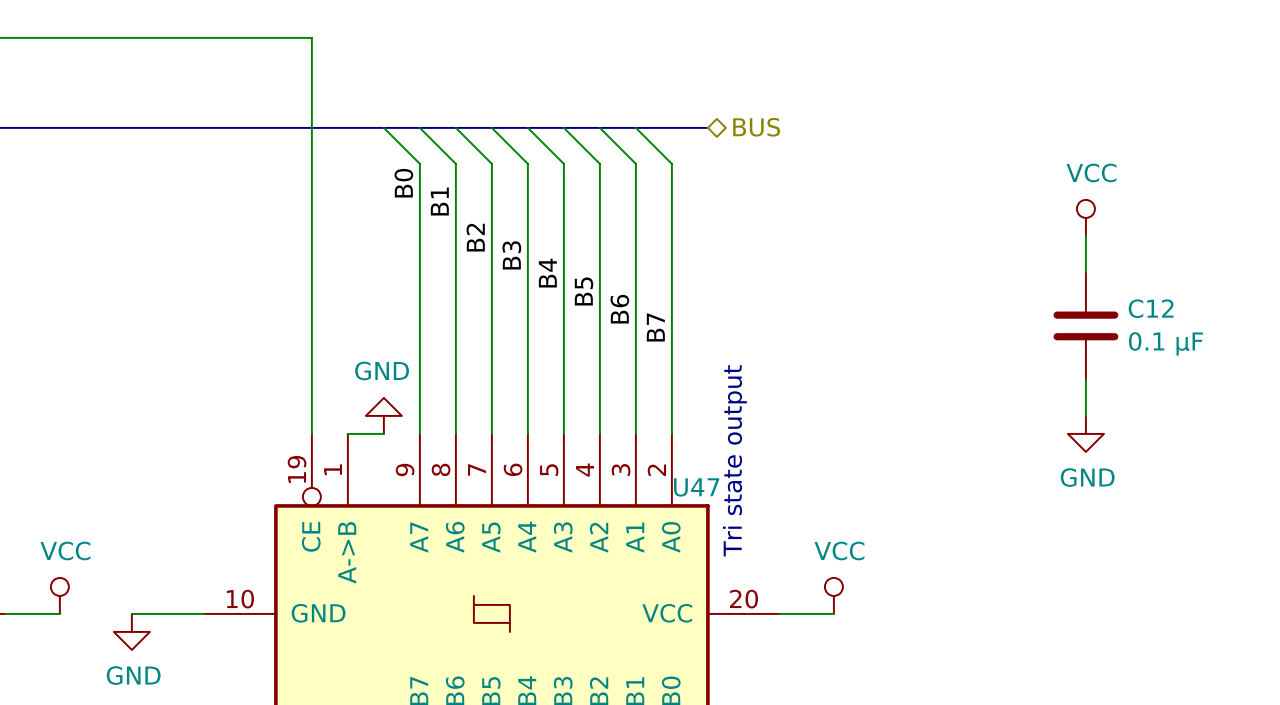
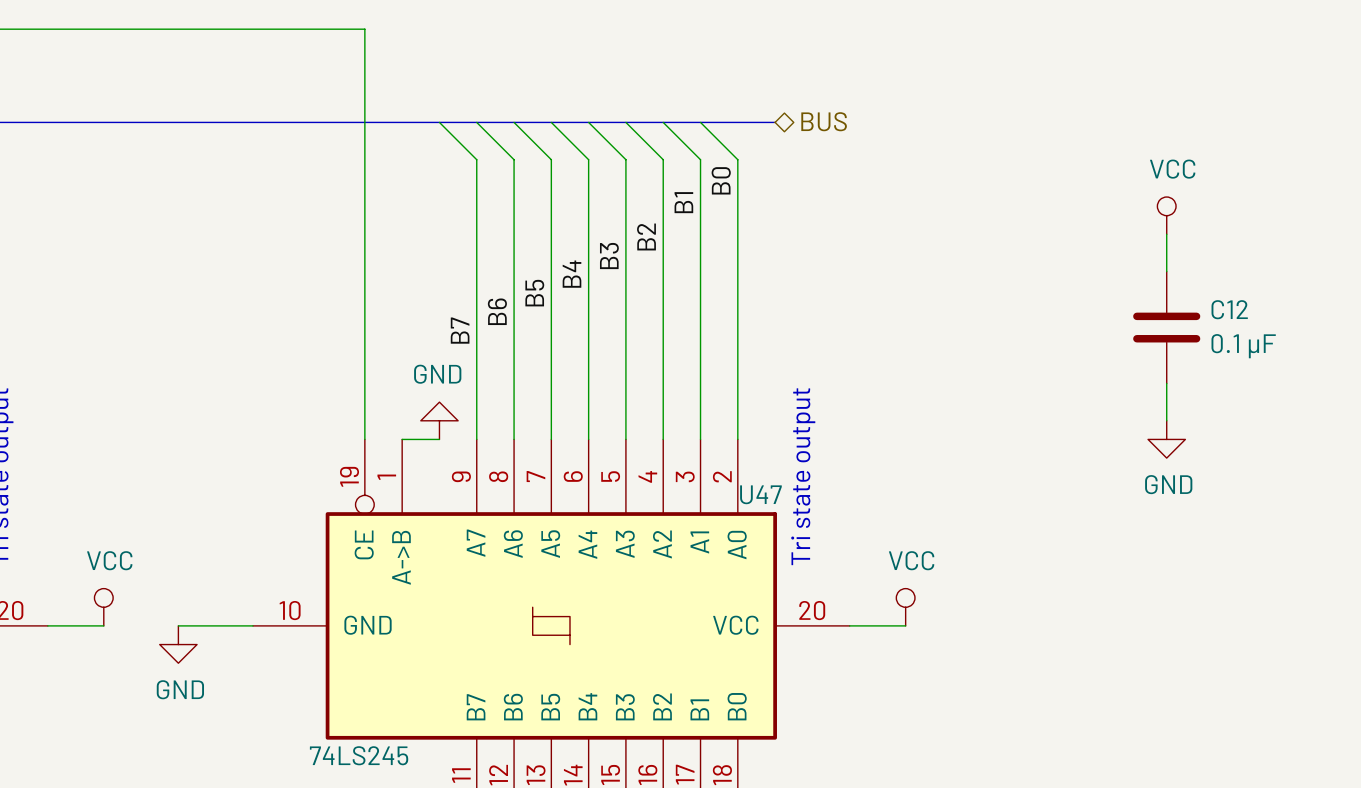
label position: B0 (403, 183) -> B0 (721, 180)
label position: B1 (439, 201) -> B1 (683, 202)
label position: B2 (475, 237) -> B2 (646, 236)
label position: B3 (511, 255) -> B3 (609, 256)
label position: B4 (547, 273) -> B4 (572, 274)
label position: B5 (584, 291) -> B5 (534, 293)
label position: B6 (619, 309) -> B6 (497, 311)
label position: B7 (655, 327) -> B7 (460, 330)

